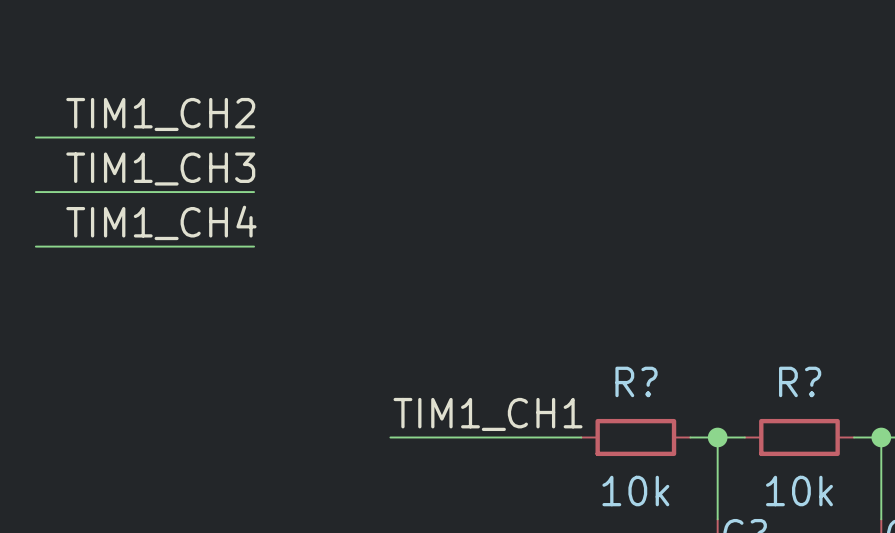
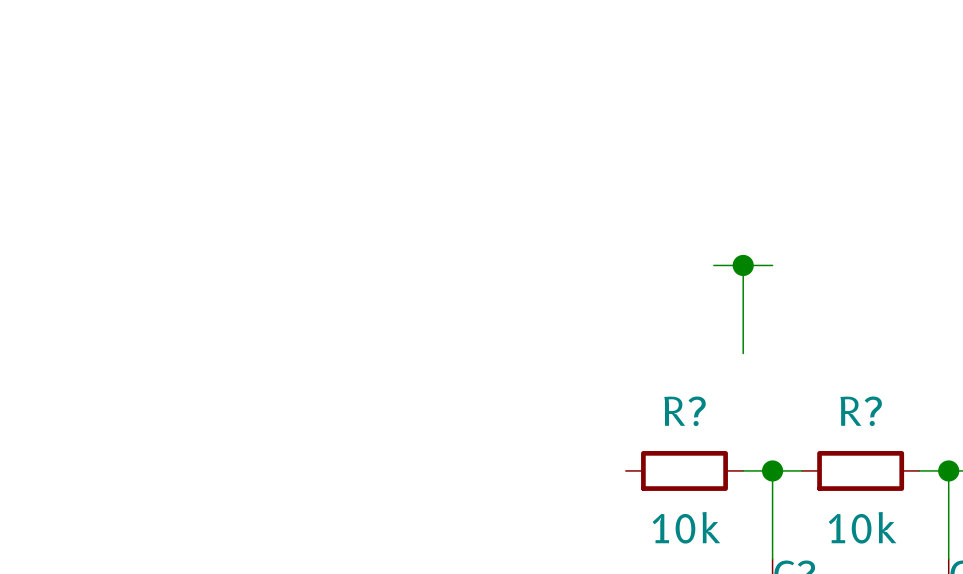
label: TIM1_CH2 (160, 114) -> none
wire: (35, 137) (254, 137) -> none
label: TIM1_CH3 (160, 169) -> none
wire: (35, 192) (254, 192) -> none
label: TIM1_CH4 (161, 222) -> none
wire: (35, 246) (254, 246) -> none
wire: none -> (713, 265) (772, 265)
wire: none -> (743, 265) (743, 353)
junction: none -> (743, 265)
label: TIM1_CH1 (488, 414) -> none
wire: (390, 437) (581, 437) -> none

